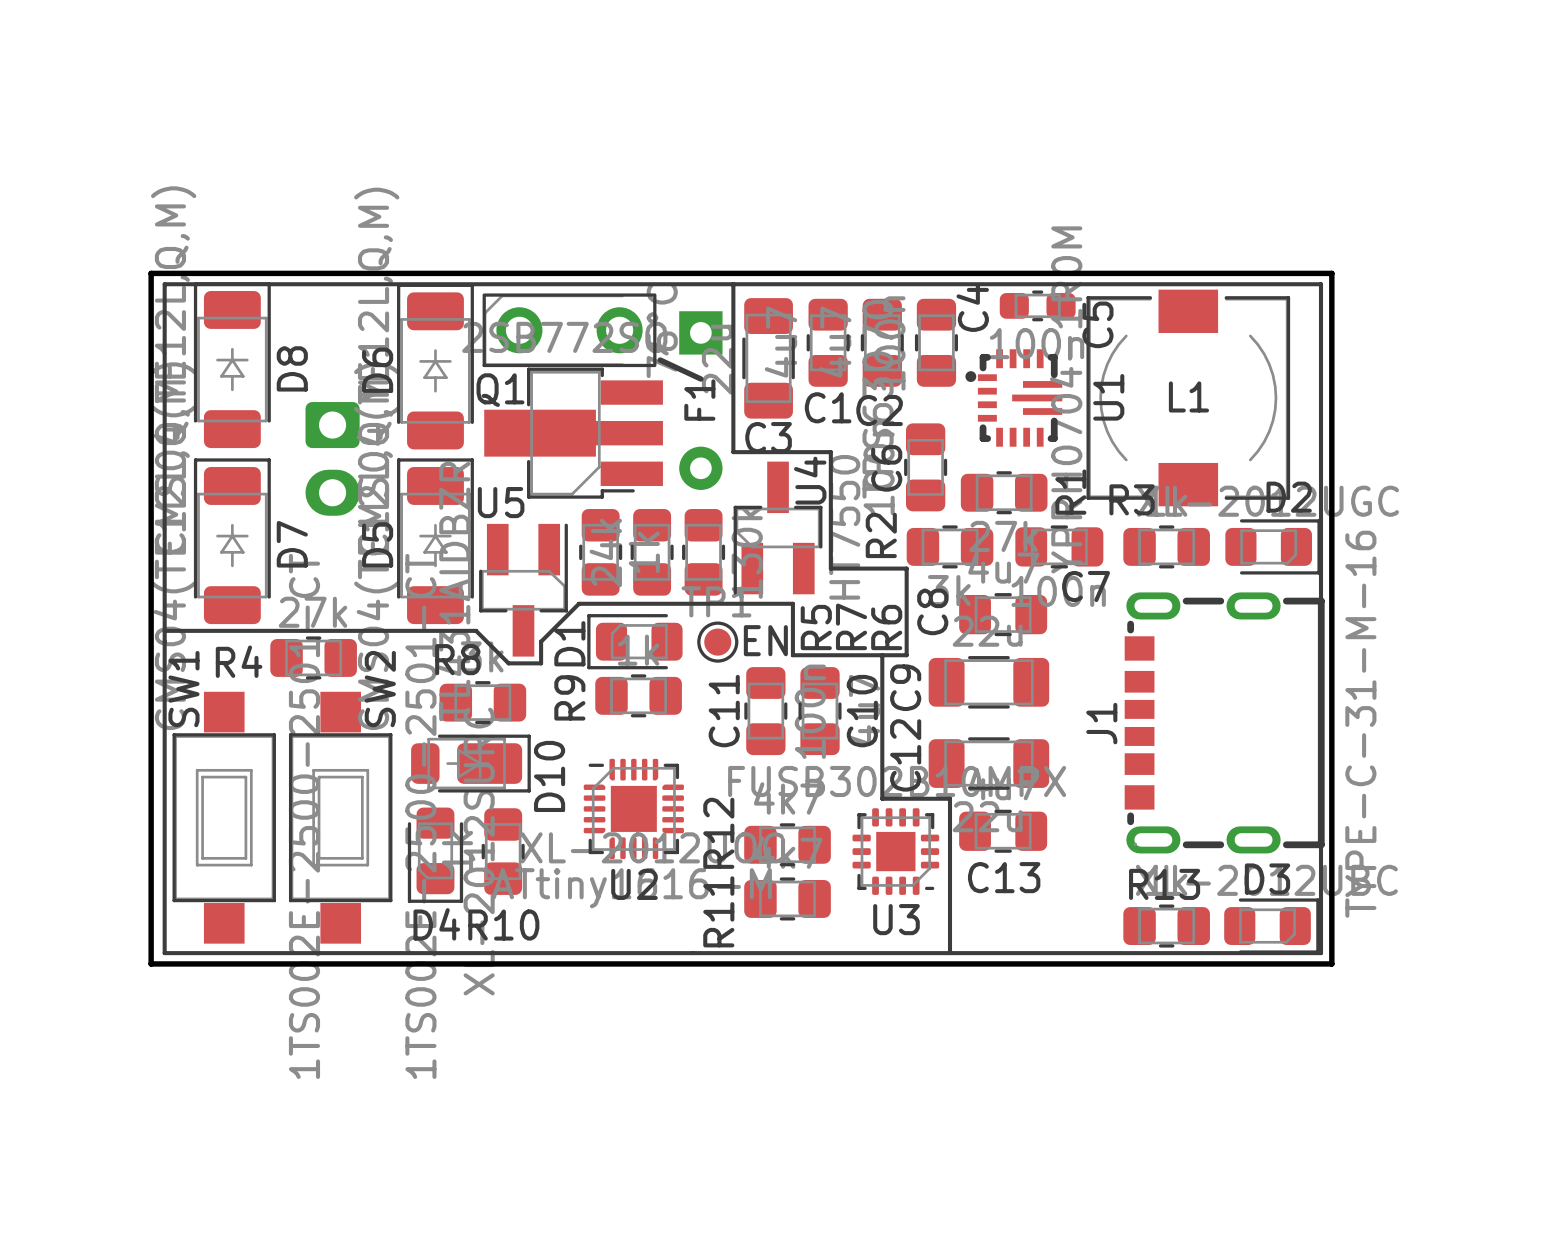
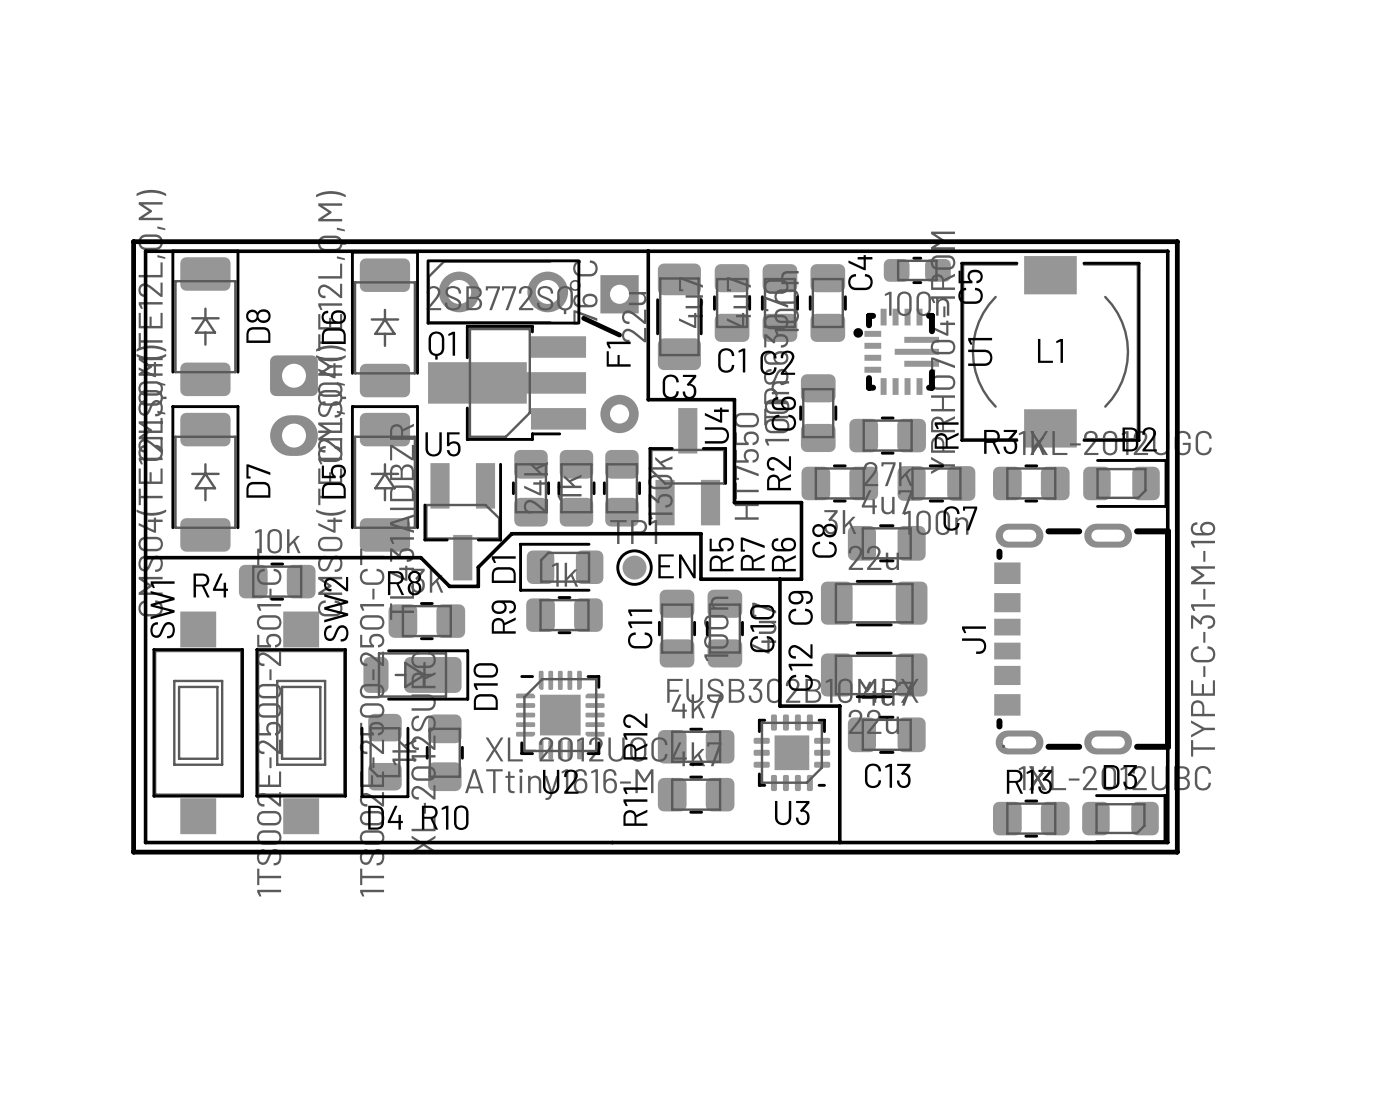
R4 value: 27k (312, 612) -> 10k (277, 541)

